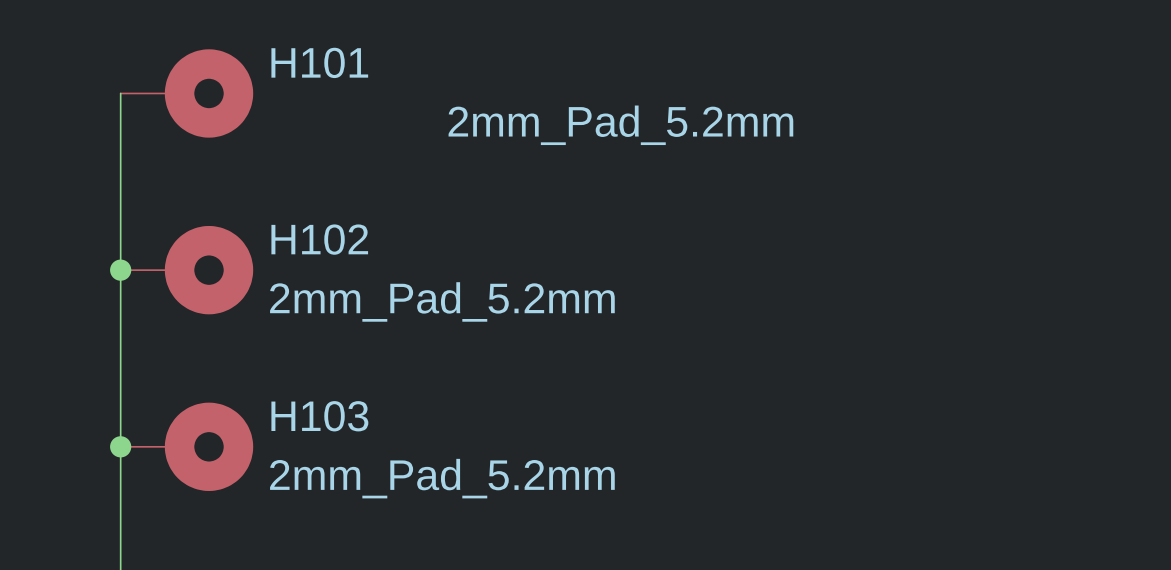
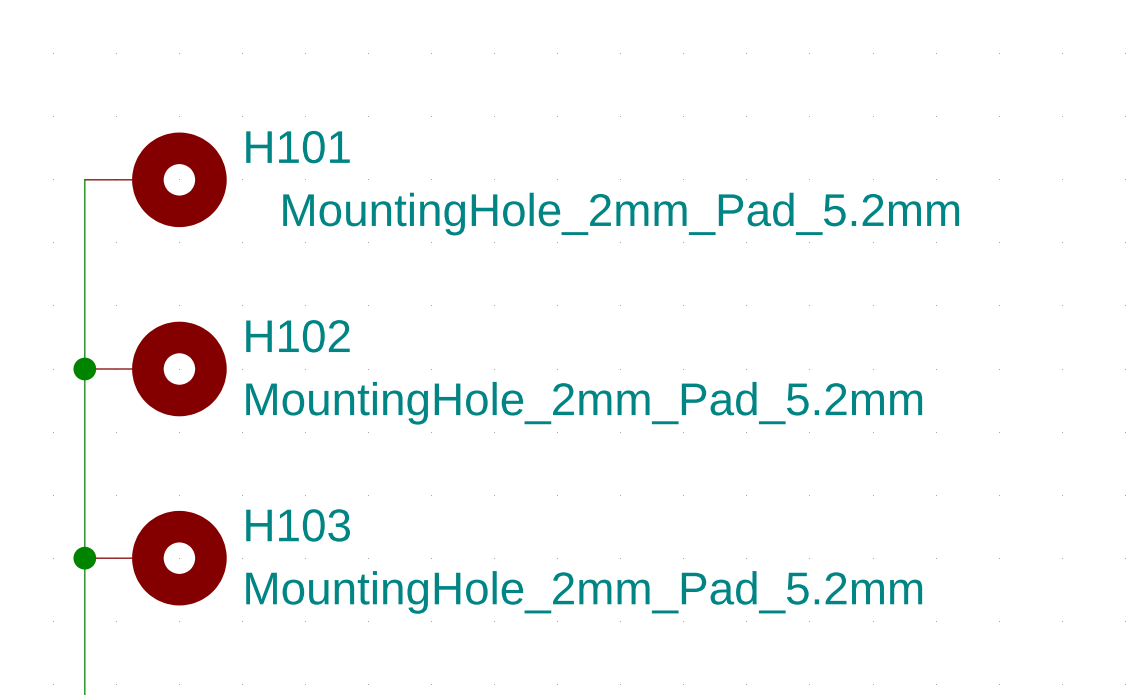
H101 value: 2mm_Pad_5.2mm (620, 125) -> MountingHole_2mm_Pad_5.2mm (621, 214)
H102 value: 2mm_Pad_5.2mm (442, 301) -> MountingHole_2mm_Pad_5.2mm (584, 403)
H103 value: 2mm_Pad_5.2mm (442, 478) -> MountingHole_2mm_Pad_5.2mm (584, 592)

